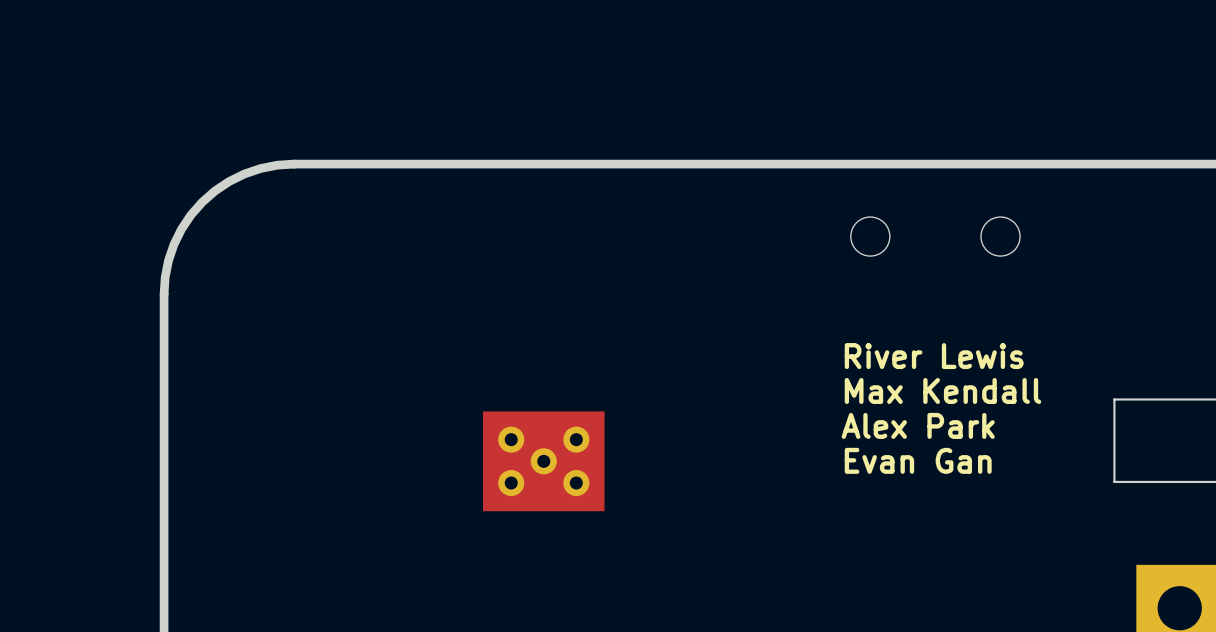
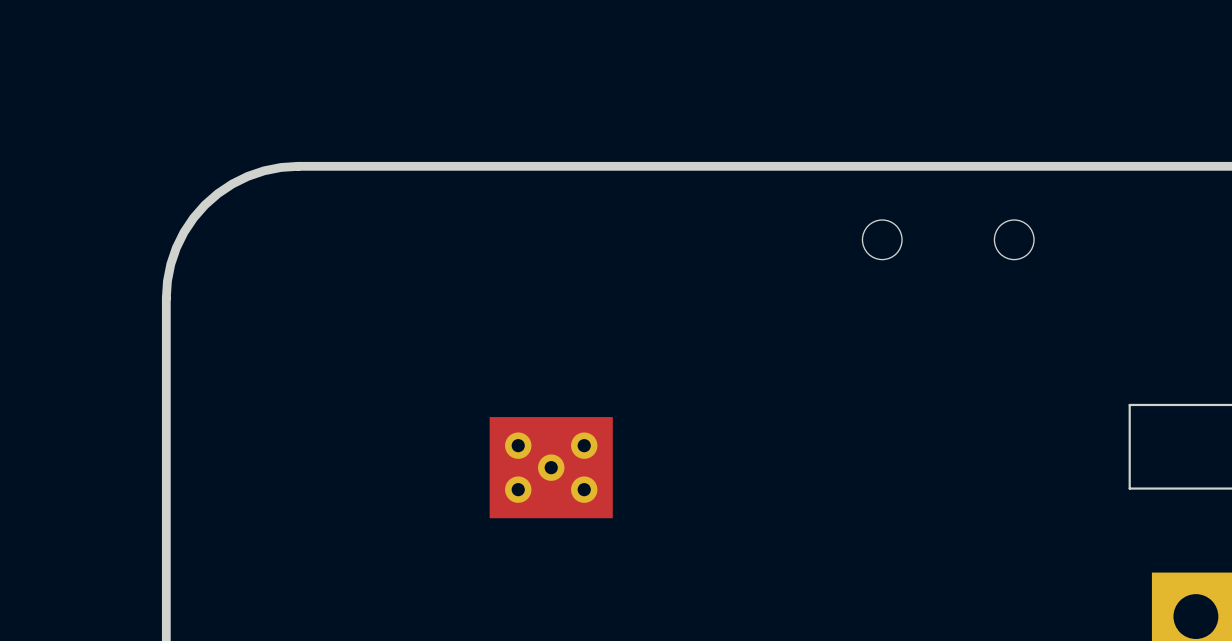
text: River Lewis (934, 356) -> none
text: Max Kendall (942, 390) -> none
text: Alex Park (918, 425) -> none
text: Evan Gan (918, 460) -> none

